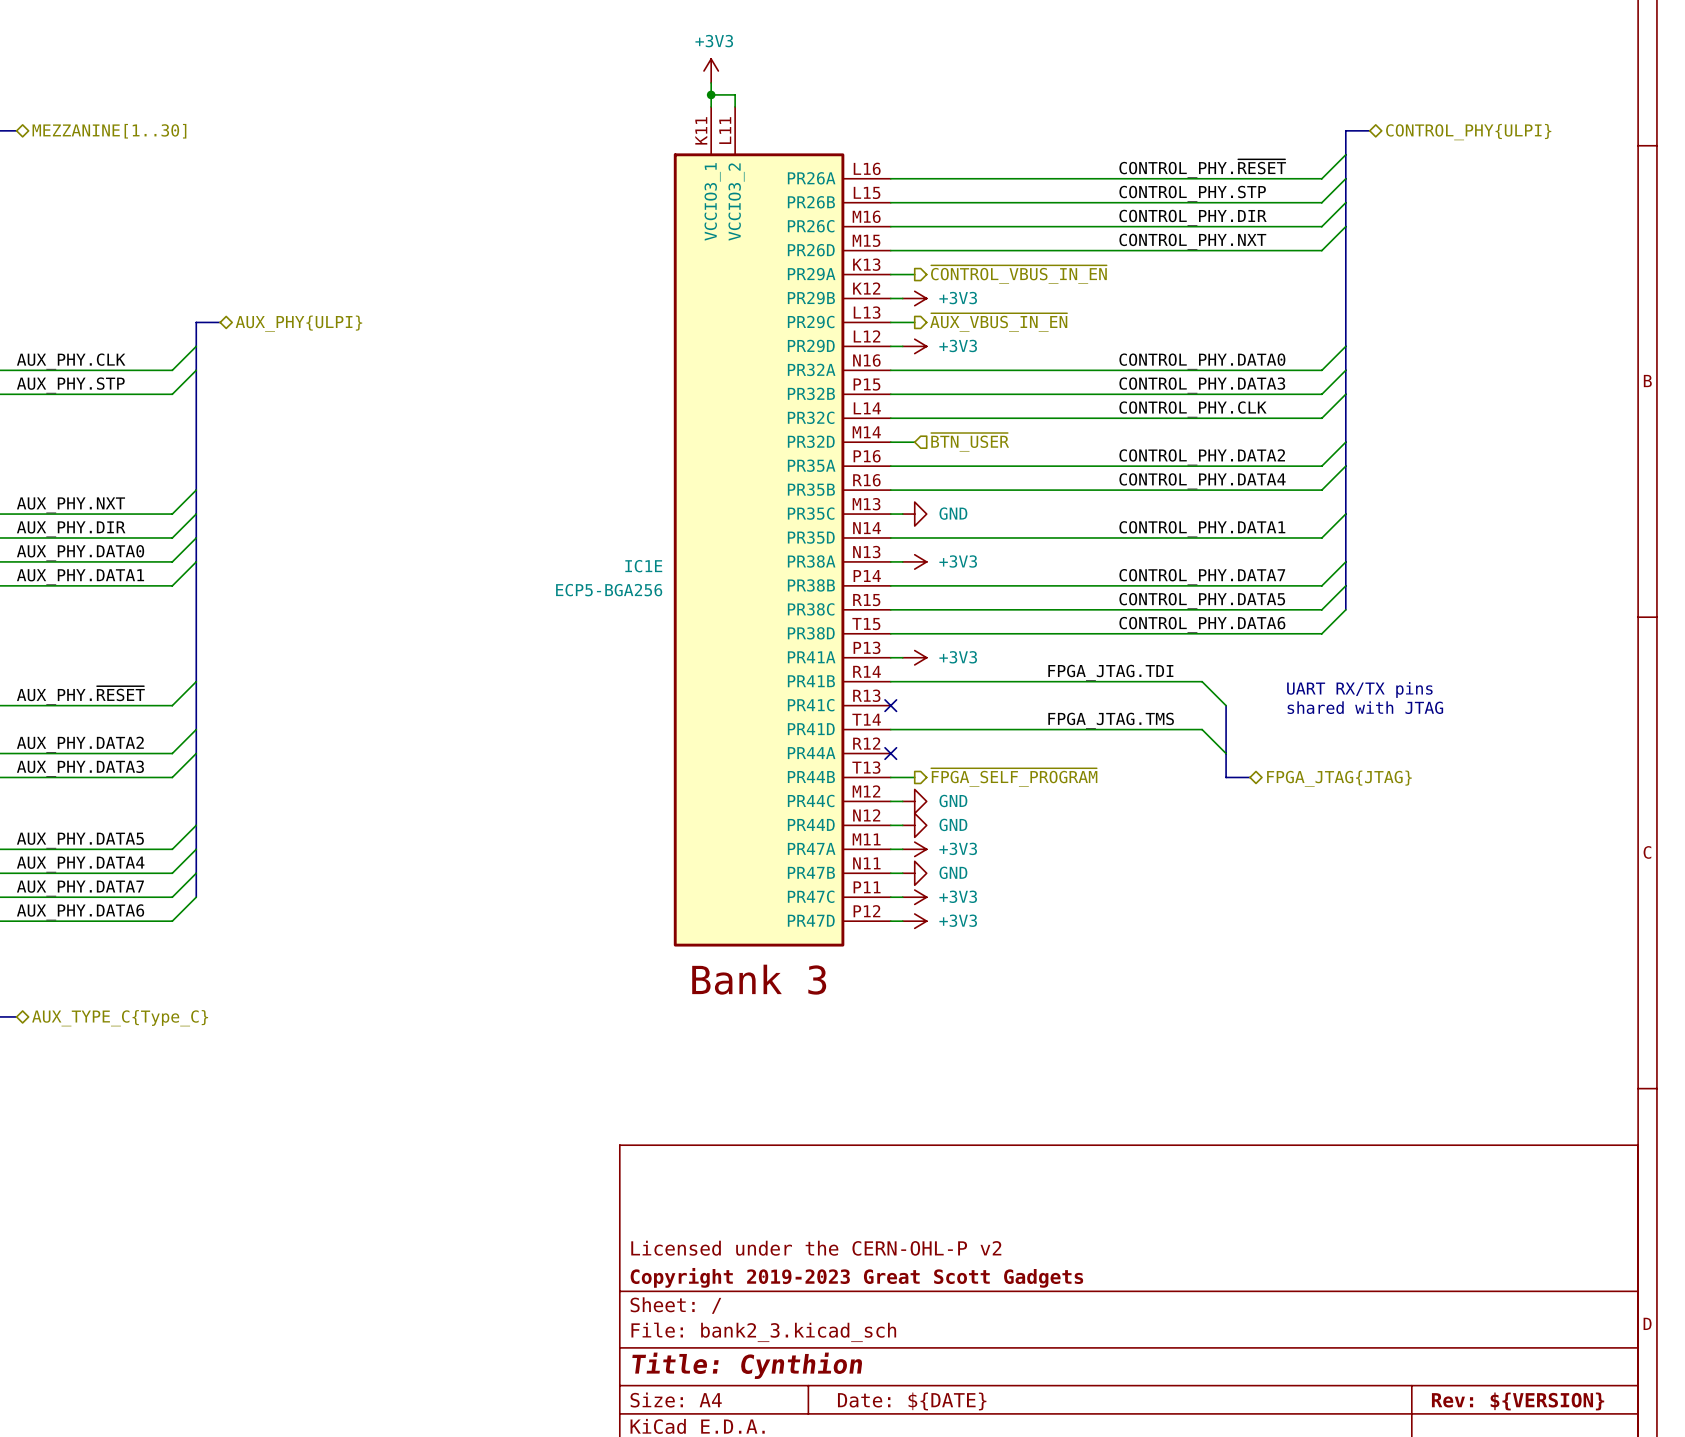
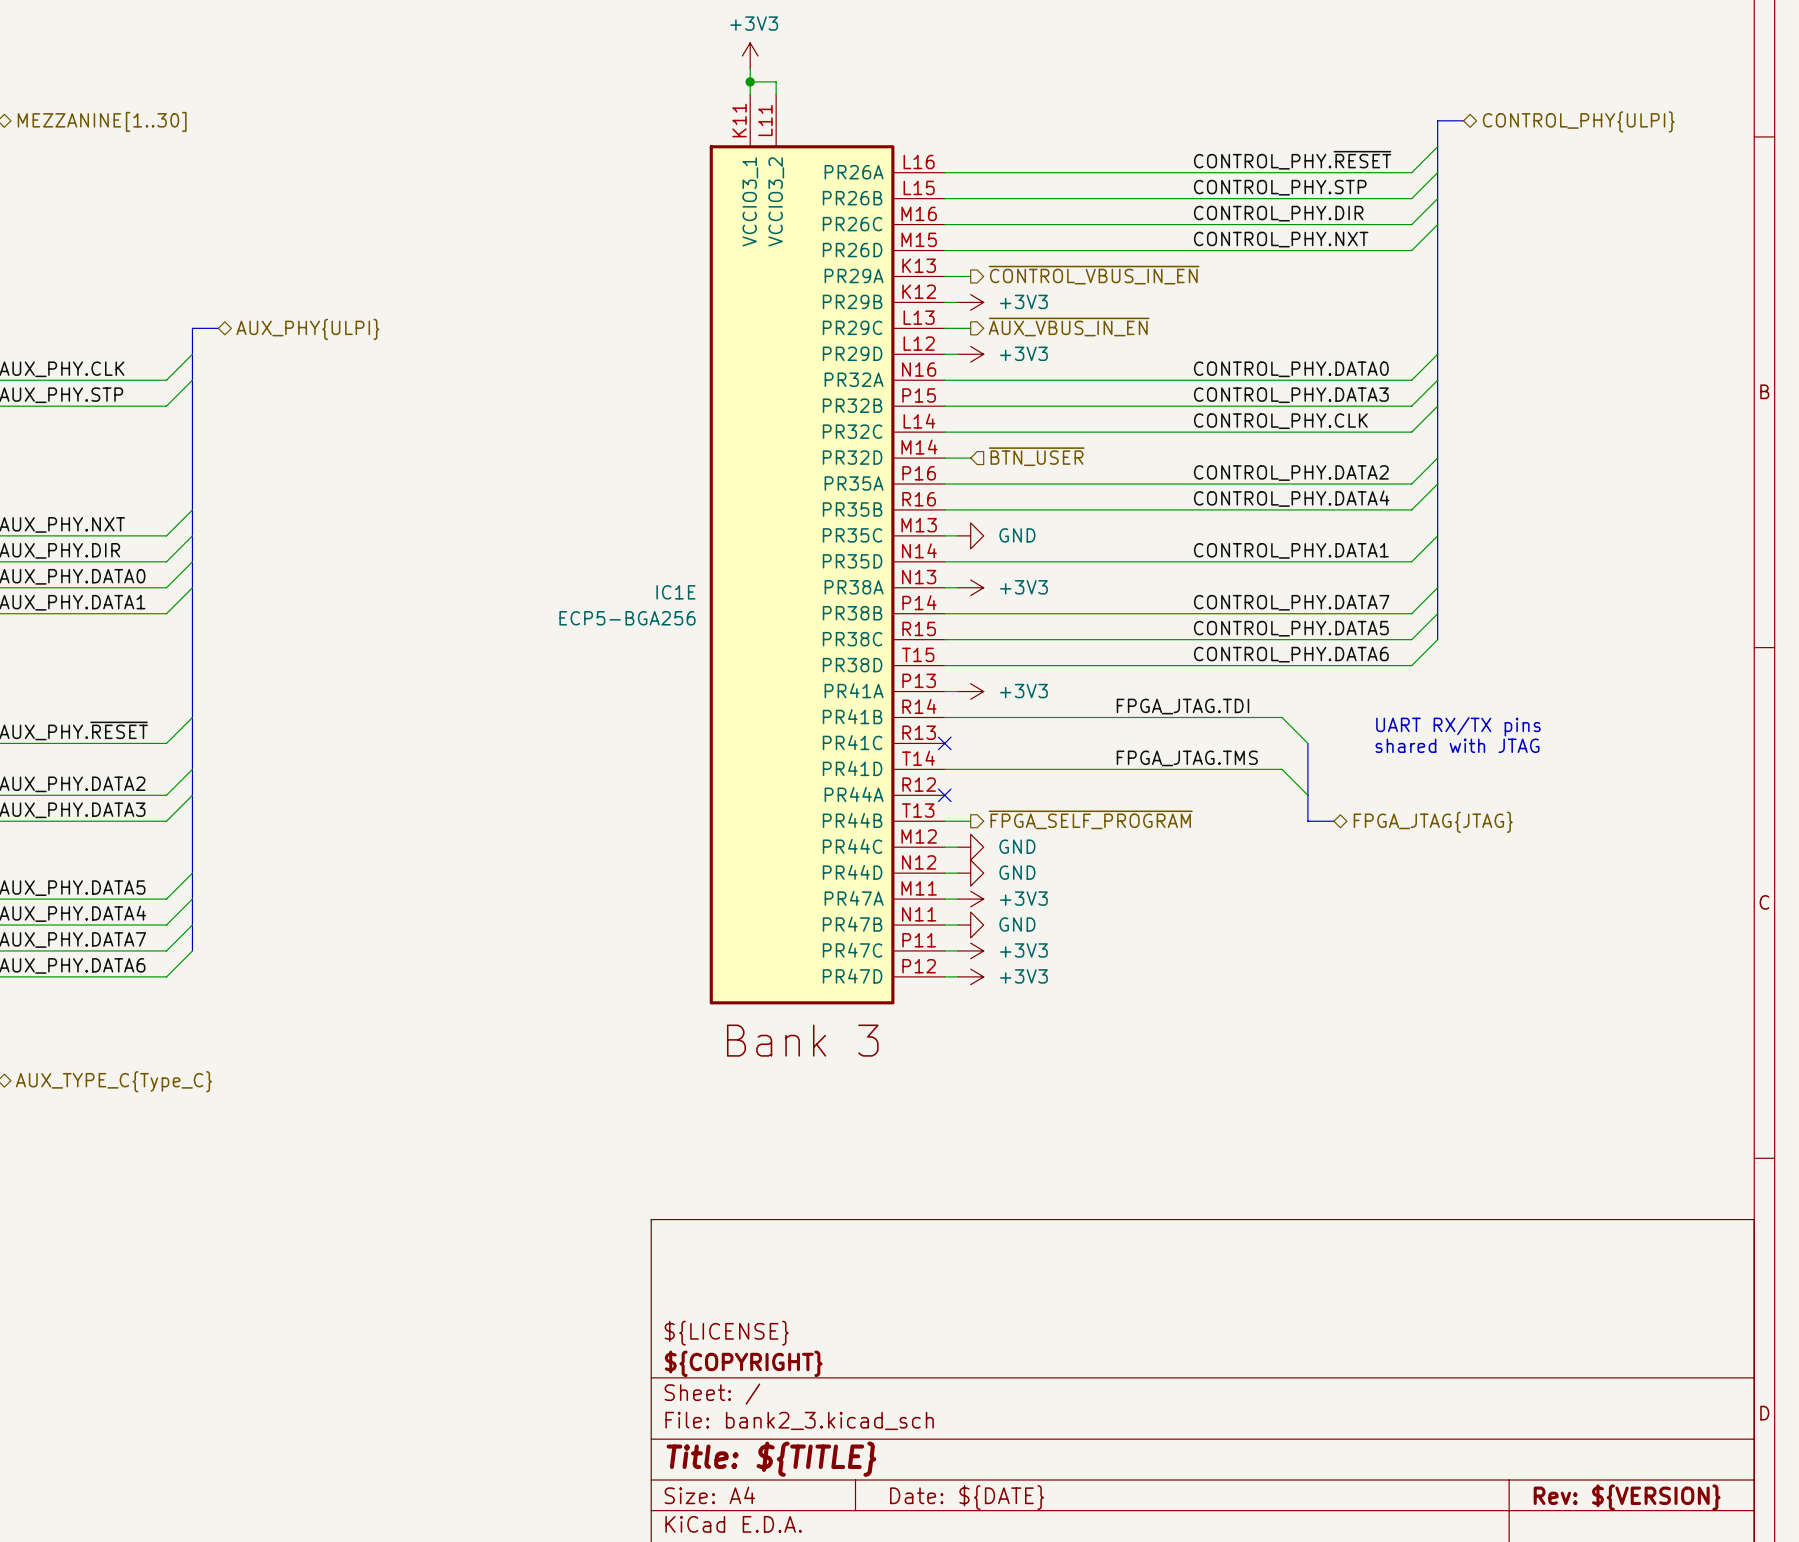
title block: Licensed under the CERN-OHL-P v2 (816, 1248) -> ${LICENSE} (726, 1333)
title block: Copyright 2019-2023 Great Scott Gadgets (856, 1277) -> ${COPYRIGHT} (743, 1363)
title block: Title: Cynthion (747, 1365) -> Title: ${TITLE} (771, 1459)

